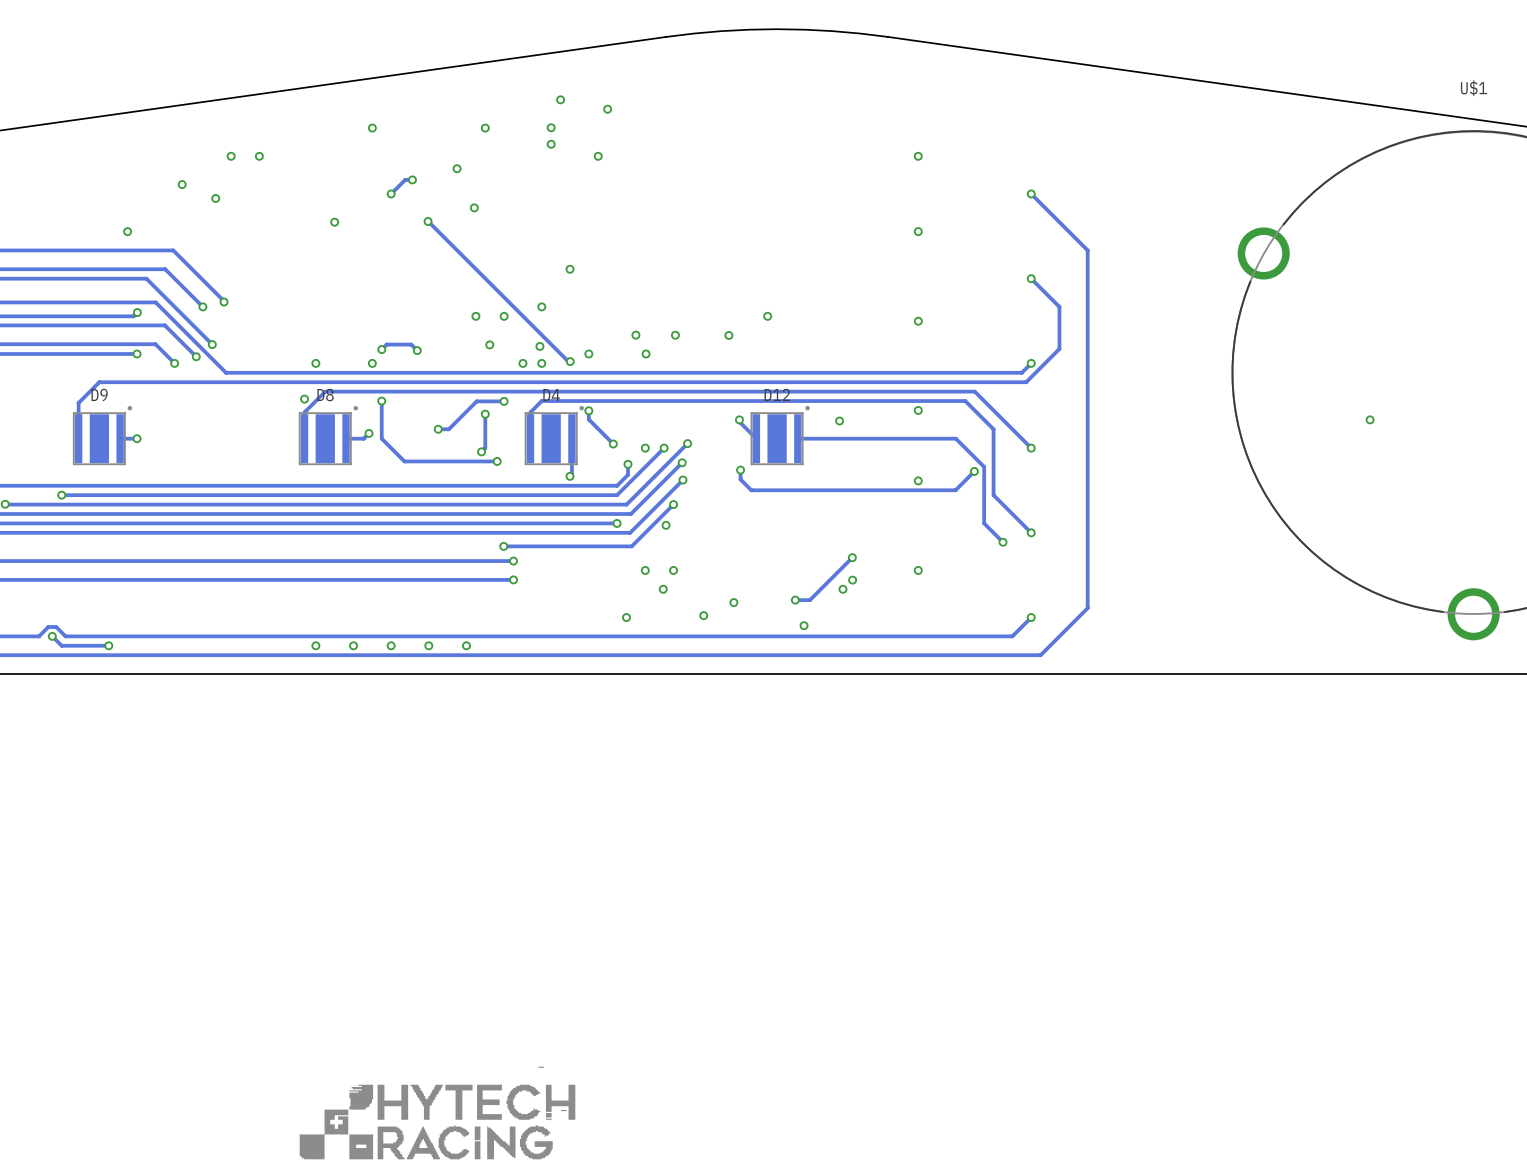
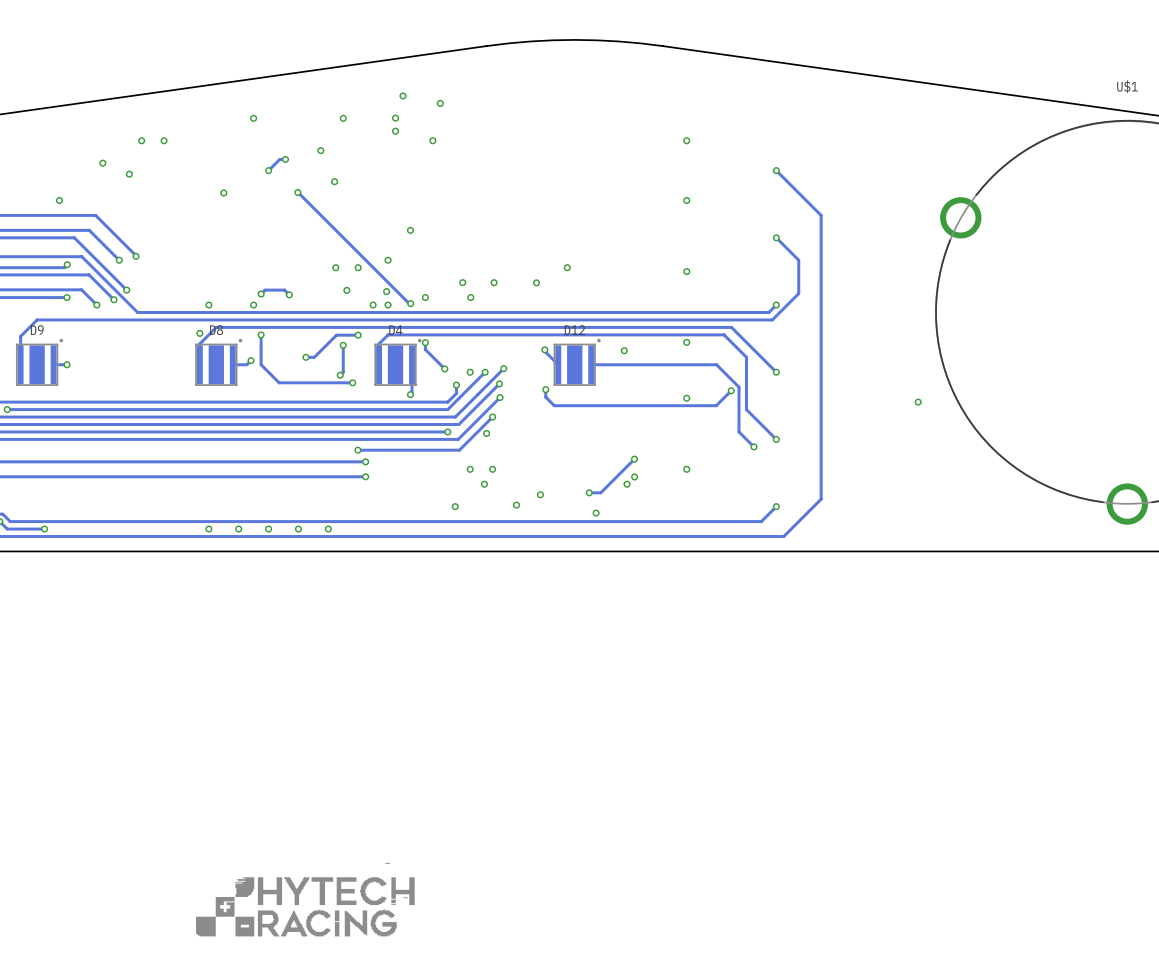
via: (1370, 419) -> none
via: none -> (918, 402)

